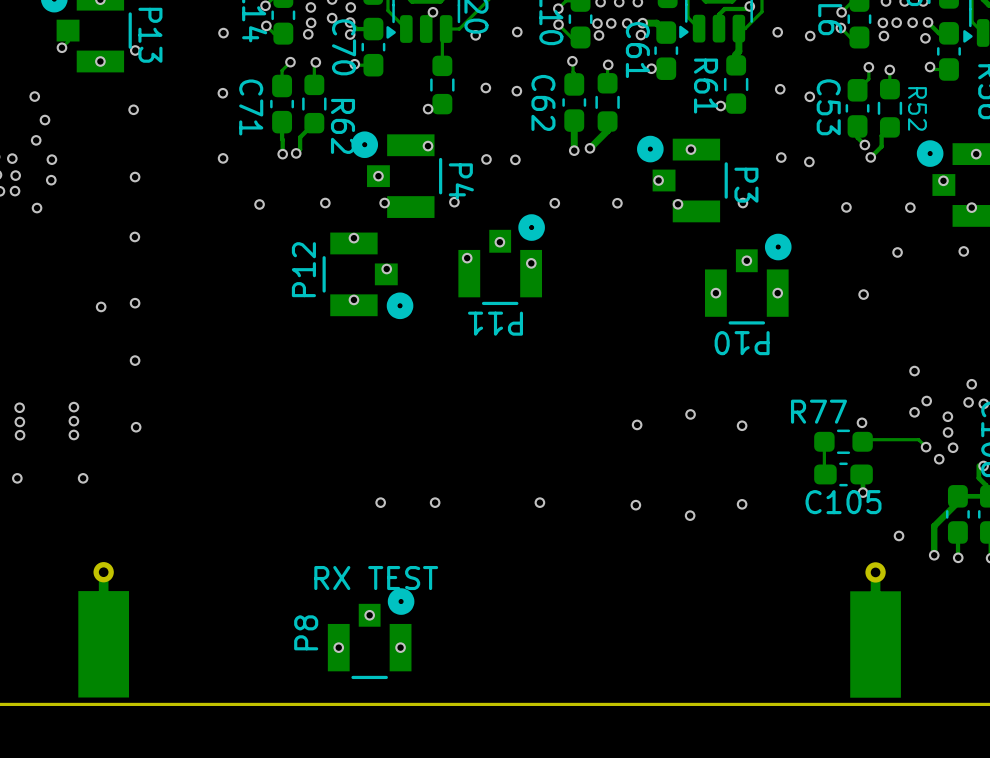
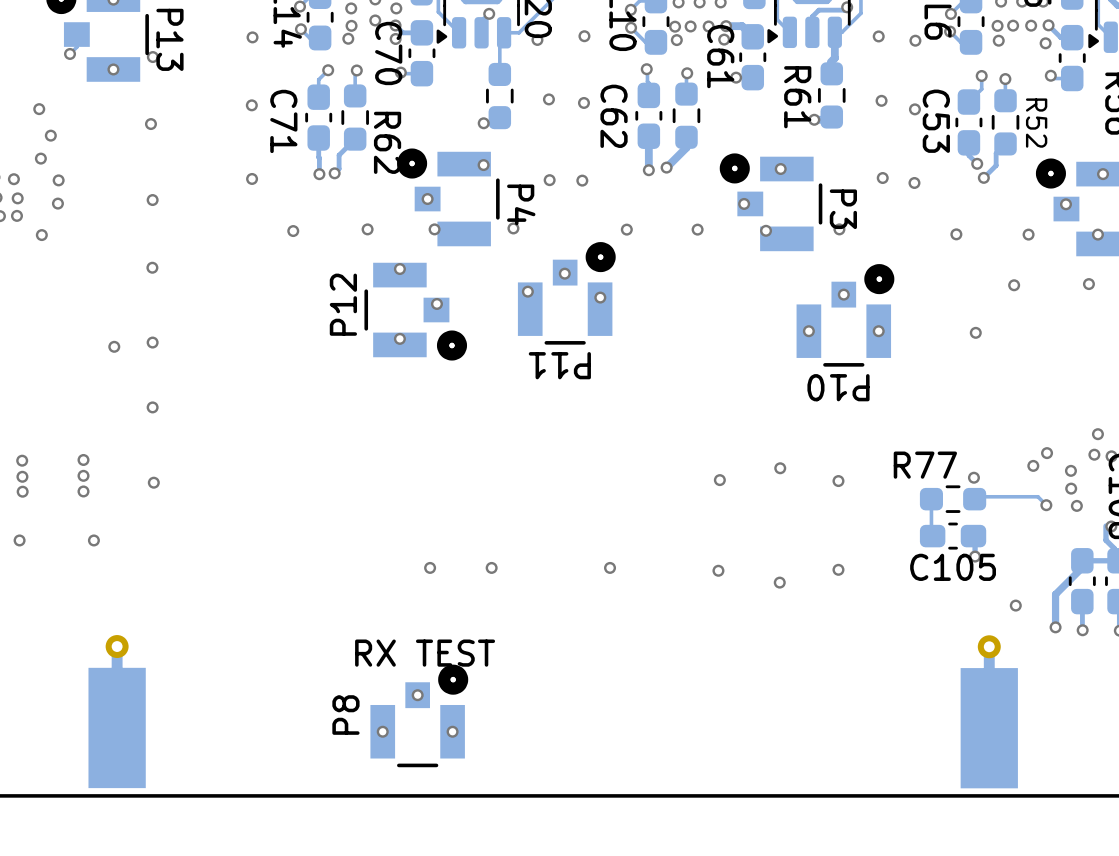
via: (914, 371) -> none
via: (939, 459) -> none

